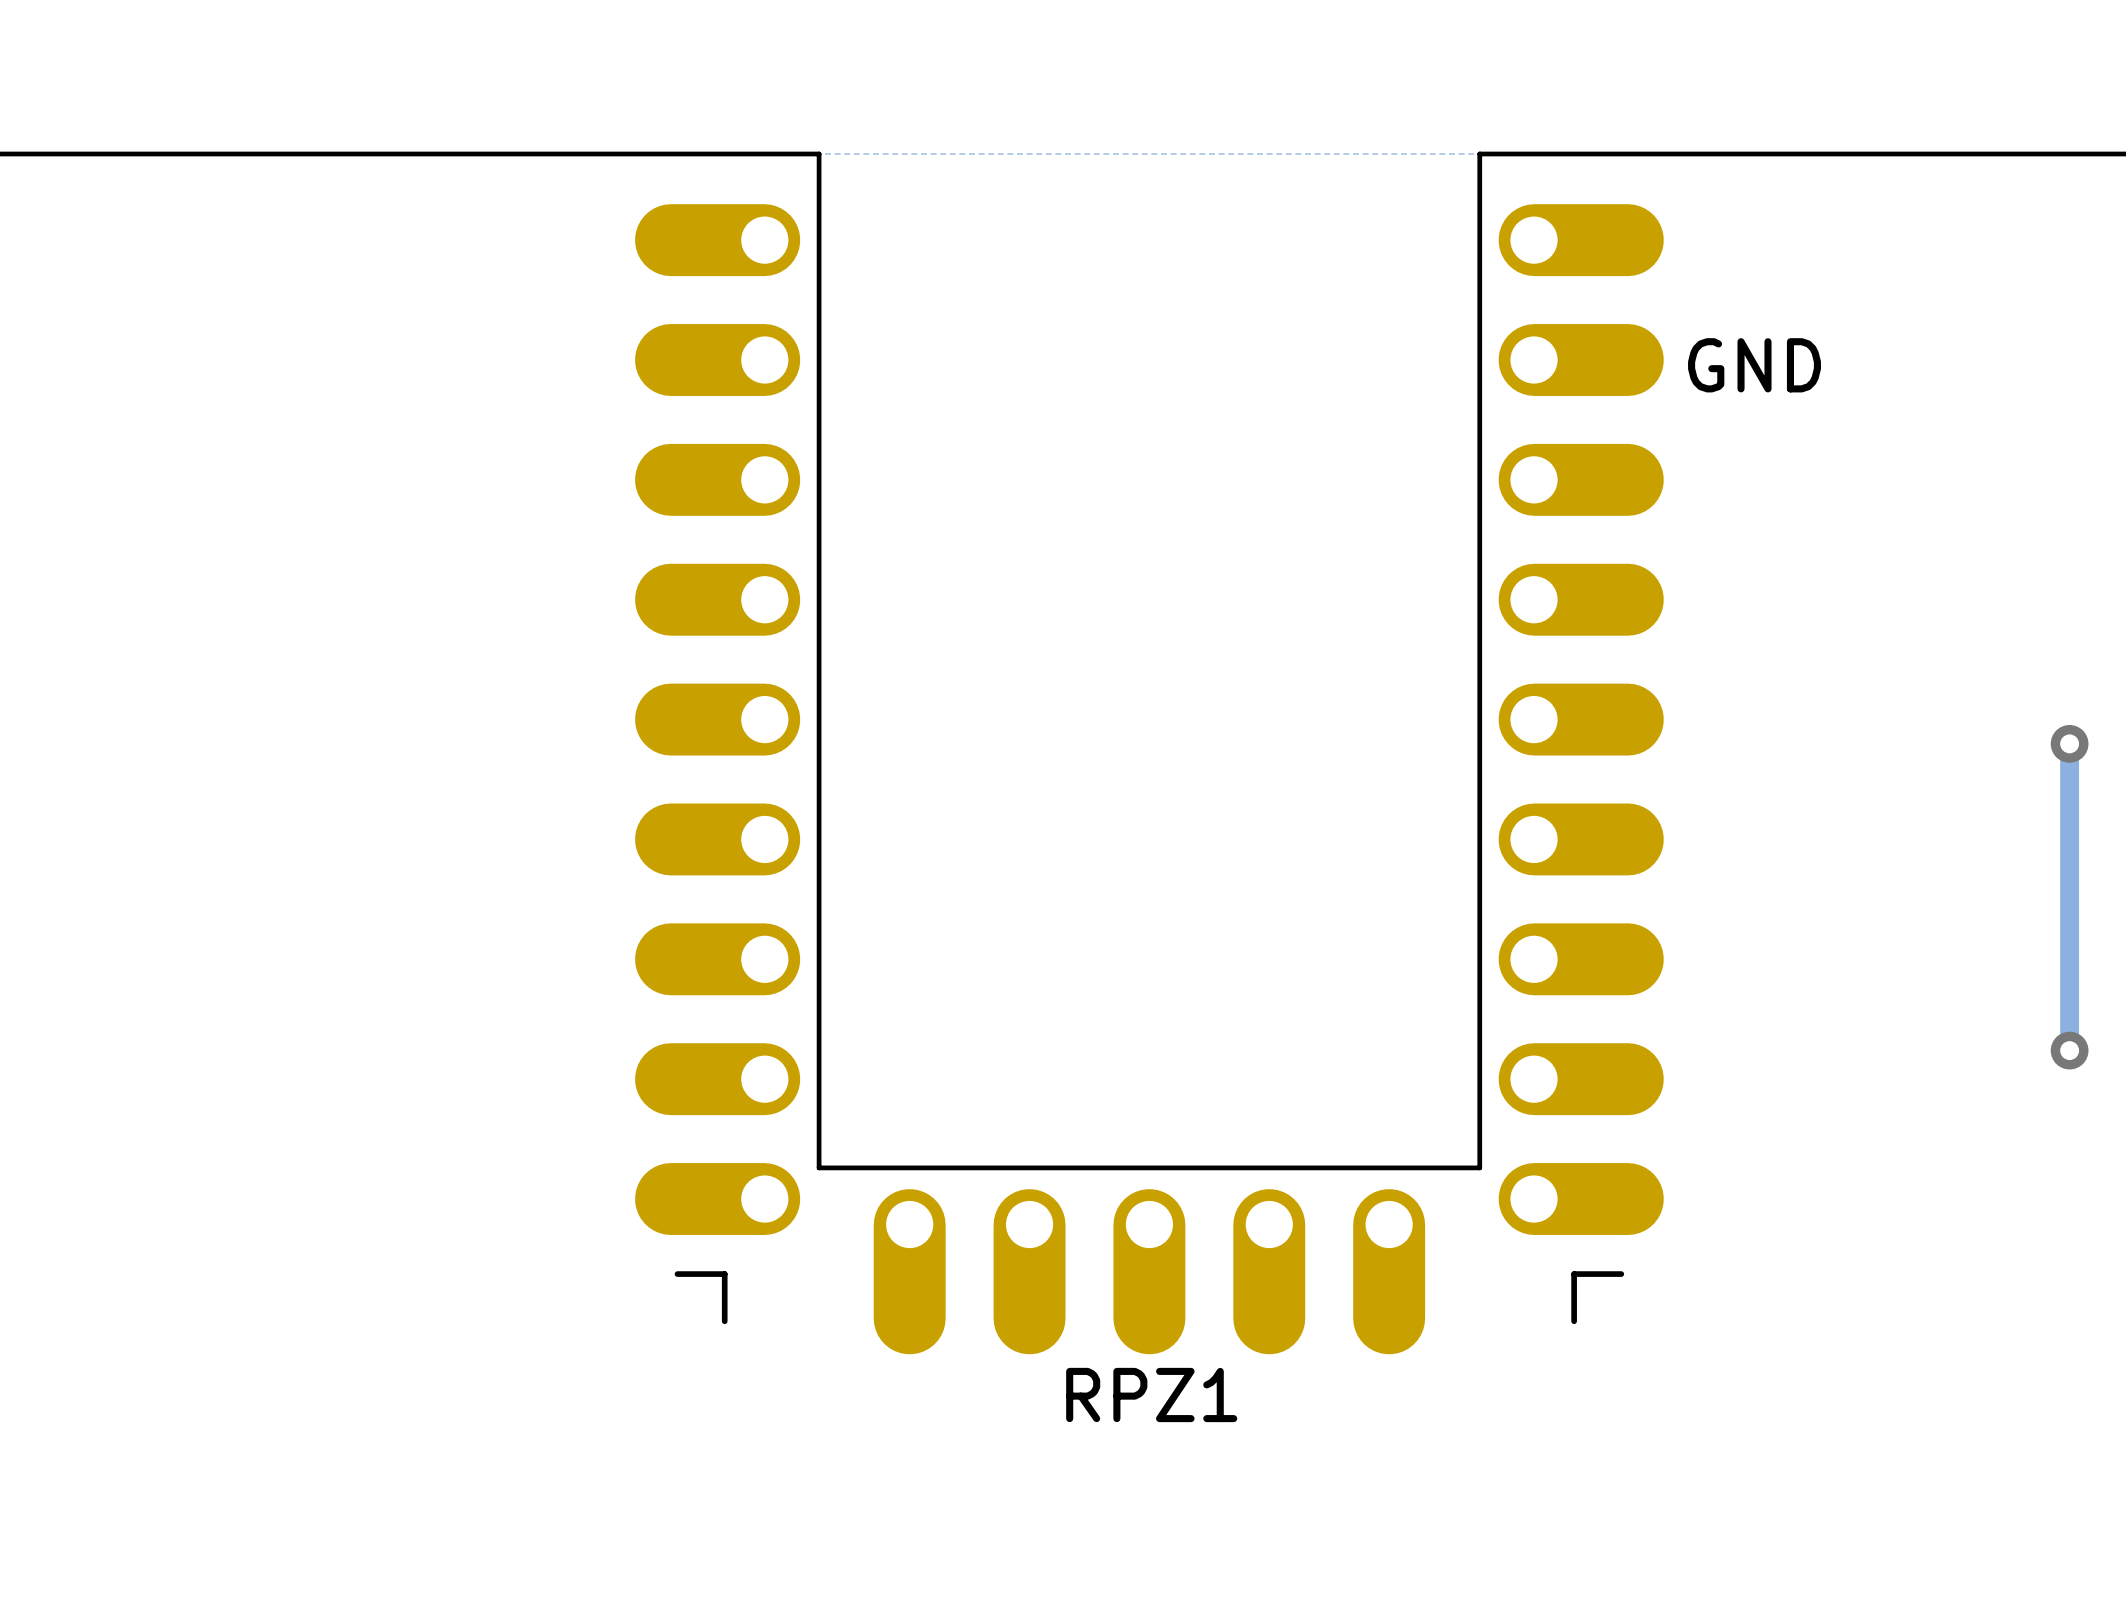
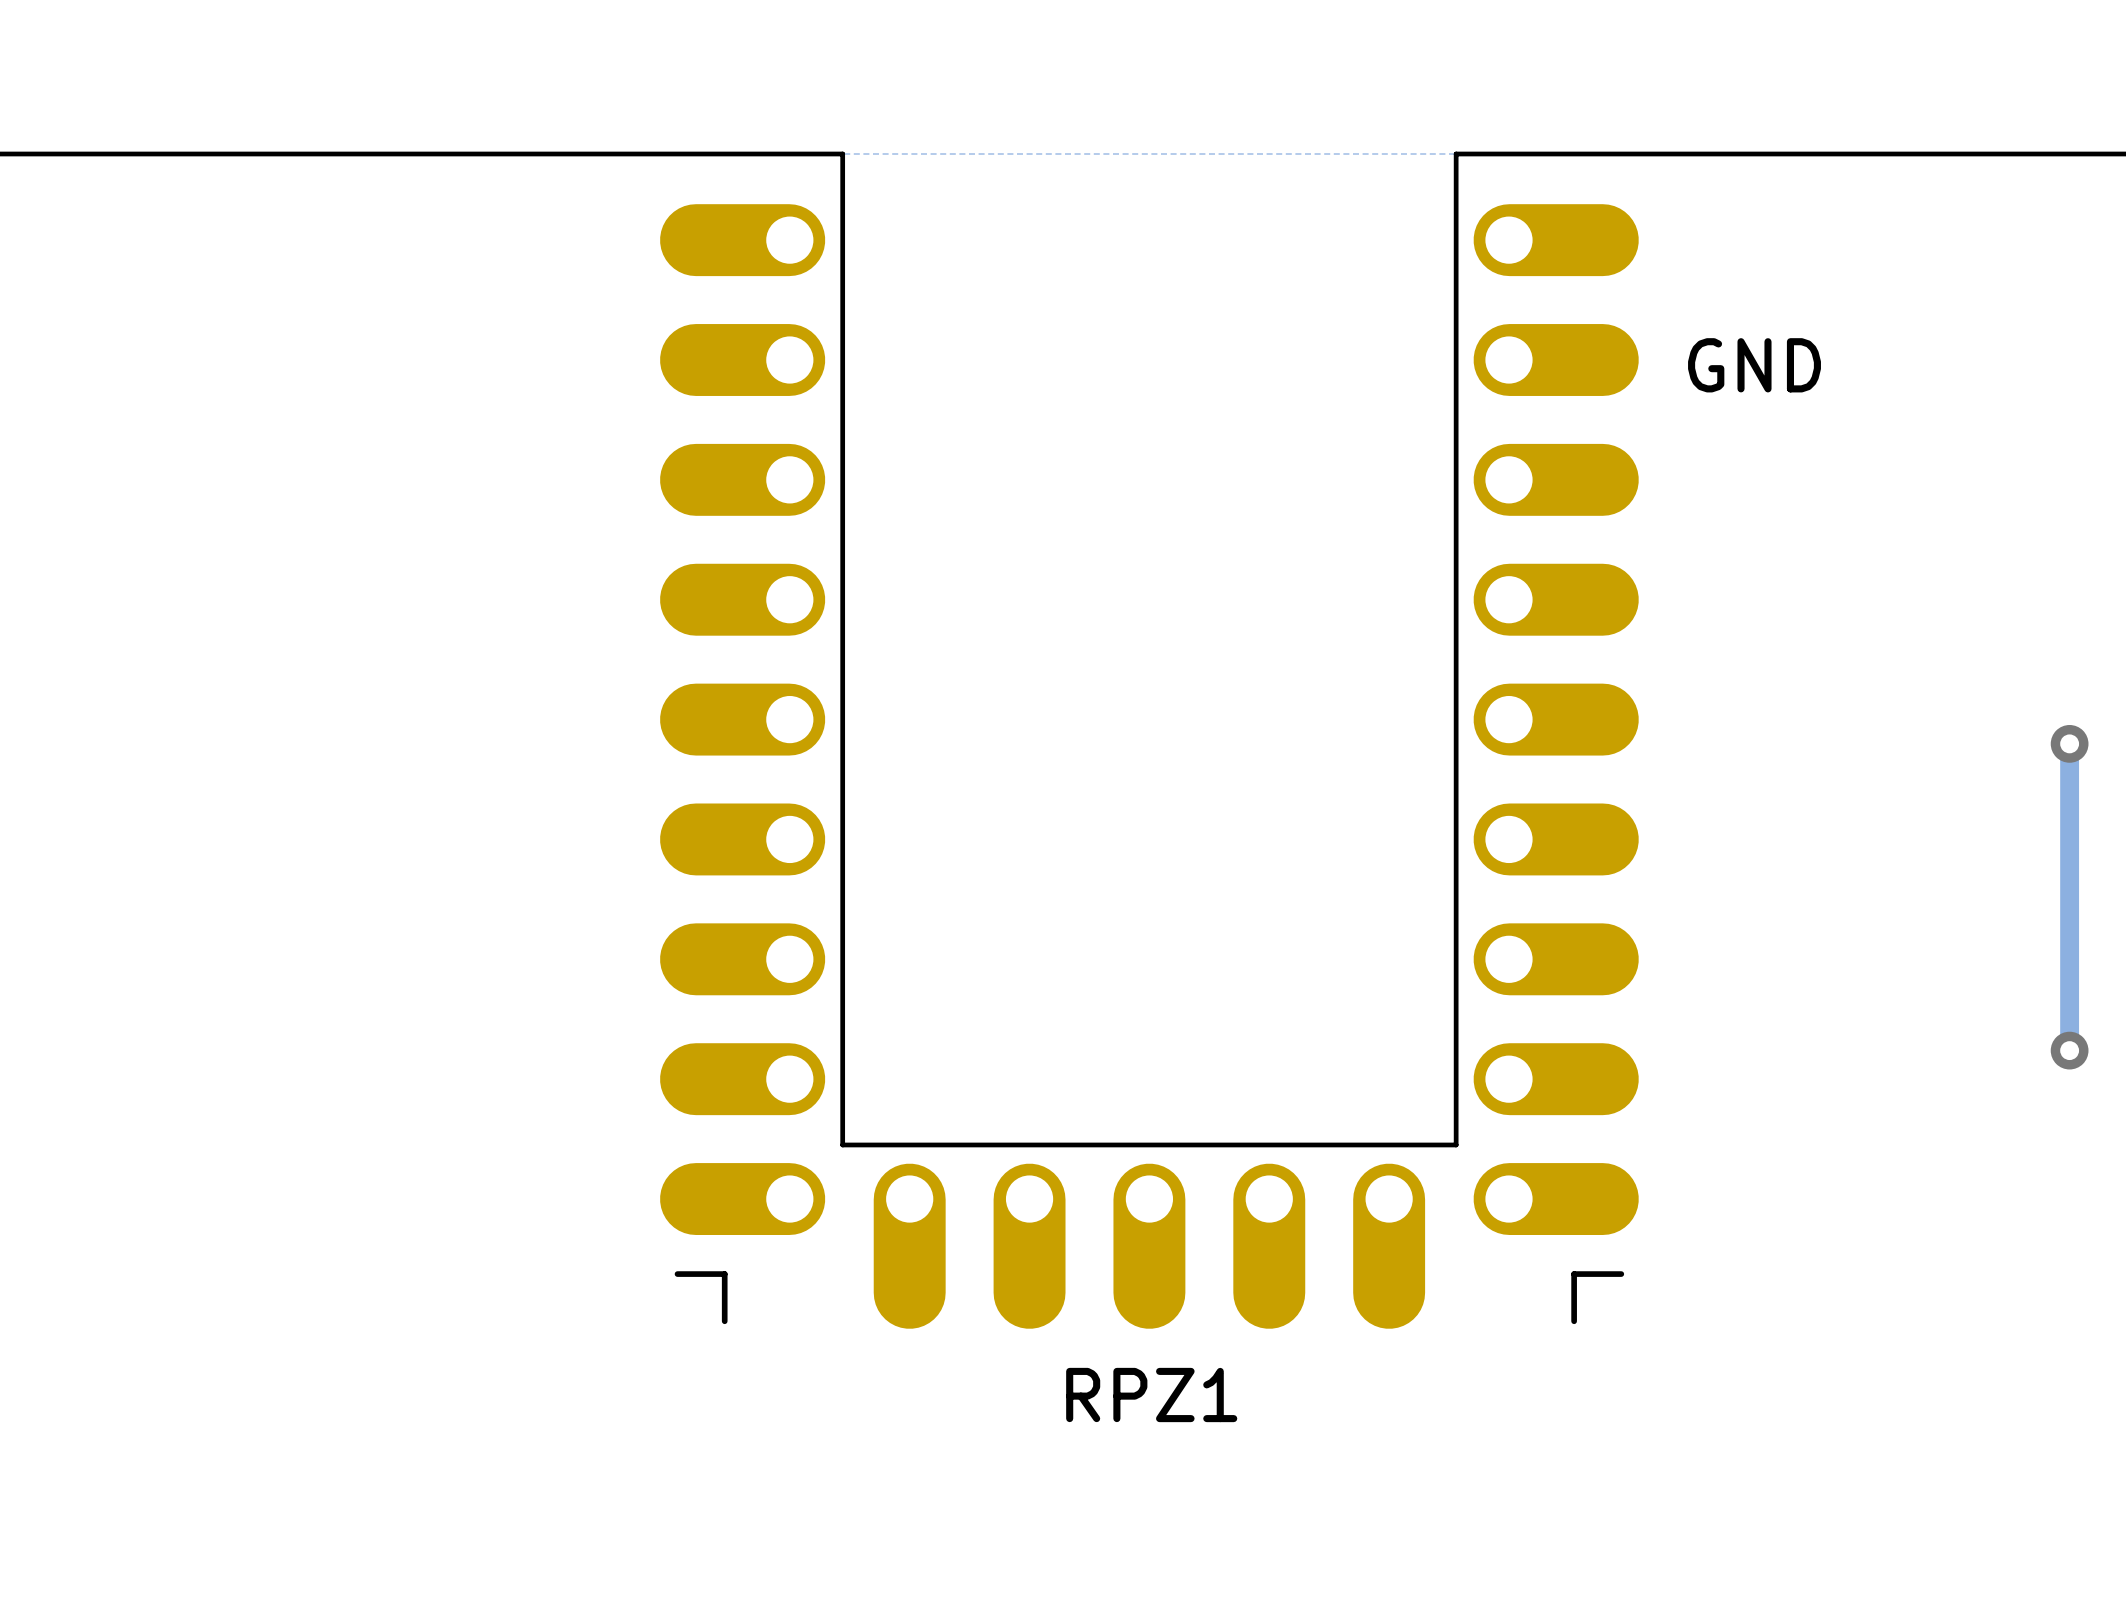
board edge: (1479, 153) (1479, 1167) (819, 1167) (819, 153) -> (1479, 153) (1456, 153) (1456, 1144) (842, 1144) (842, 153) (819, 153)
RPZ1 footprint: [635, 204, 1664, 1355] -> [660, 204, 1639, 1329]

